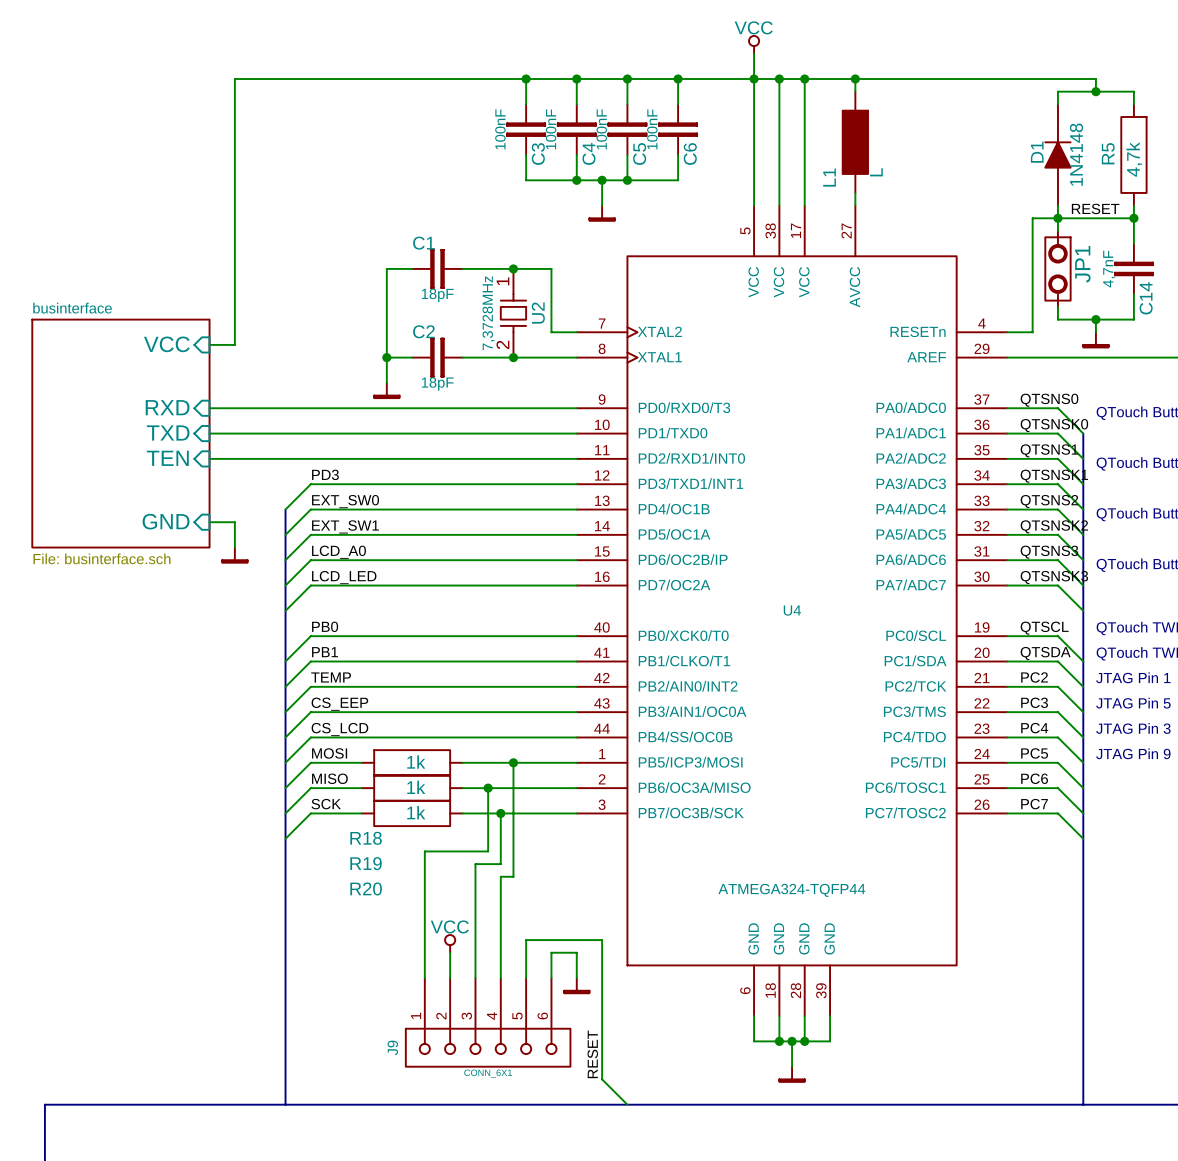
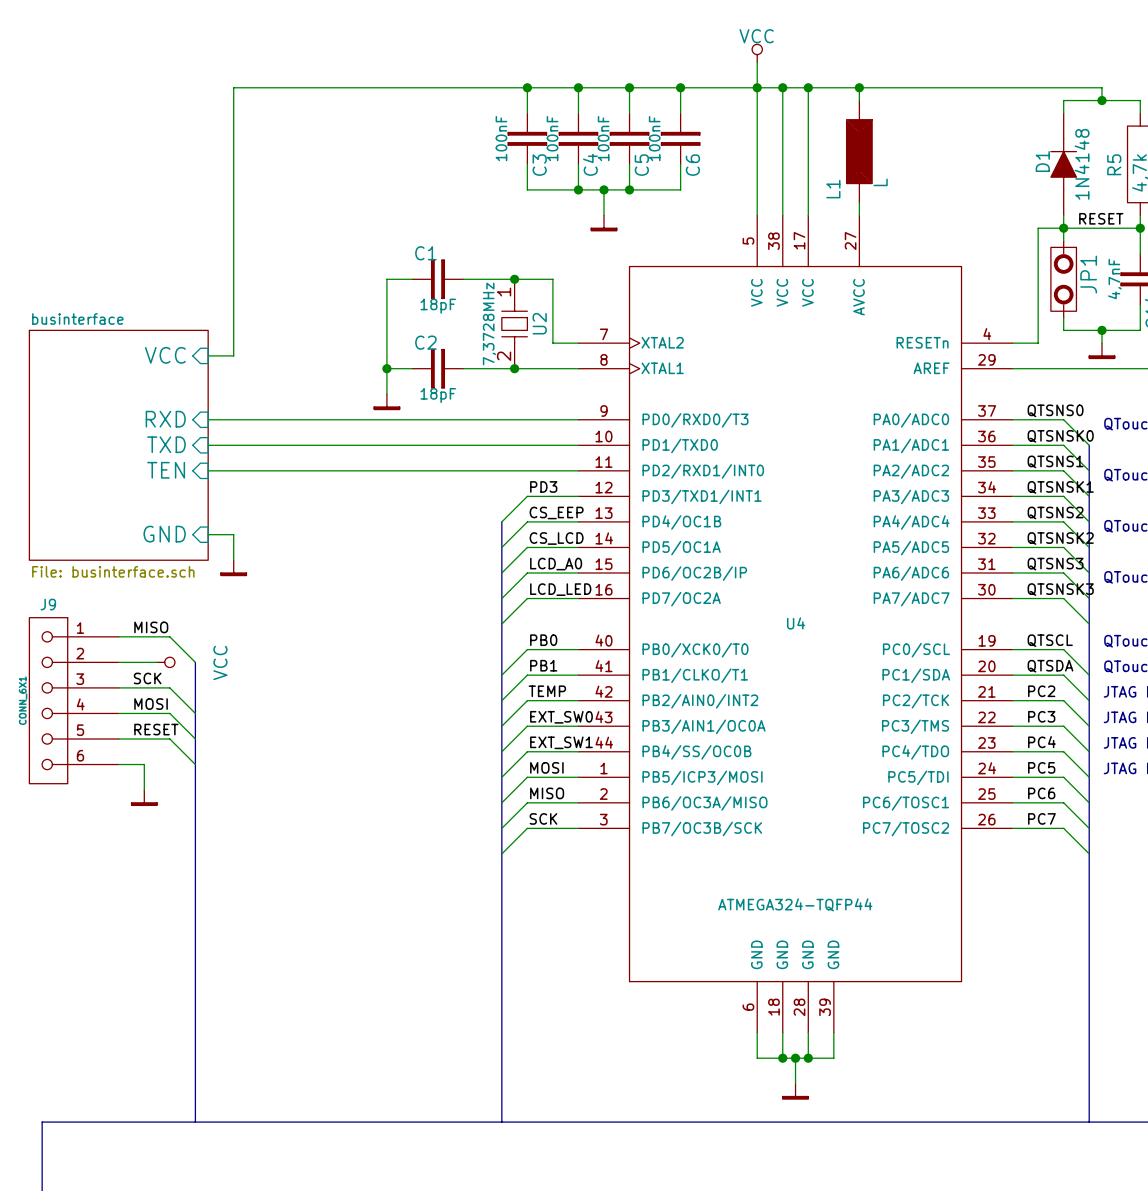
label position: PD3 (325, 474) -> PD3 (543, 486)
wire: (526, 484) (310, 484) (285, 509) -> (527, 496) (501, 521)
label: EXT_SW0 (345, 501) -> none
label: none -> CS_EEP (556, 512)
bus: (285, 509) (285, 1104) -> (501, 521) (501, 1122)
wire: (526, 509) (310, 509) (285, 534) -> (527, 521) (501, 547)
label: EXT_SW1 (345, 526) -> none
label: none -> CS_LCD (556, 538)
wire: (526, 534) (310, 534) (285, 560) -> (527, 547) (501, 572)
label position: LCD_A0 (339, 552) -> LCD_A0 (556, 564)
wire: (526, 560) (310, 560) (285, 585) -> (527, 572) (501, 598)
label position: LCD_LED (344, 577) -> LCD_LED (560, 589)
wire: (526, 585) (310, 585) (285, 610) -> (527, 598) (501, 624)
label: none -> MISO (151, 627)
wire: none -> (118, 636) (169, 636) (195, 662)
label position: PB0 (325, 626) -> PB0 (543, 640)
wire: (526, 636) (310, 636) (285, 661) -> (527, 649) (501, 675)
wire: none -> (118, 662) (157, 662)
power symbol: none -> VCC (166, 662)
bus: none -> (195, 662) (195, 1122)
label position: PB1 (325, 652) -> PB1 (543, 665)
wire: (526, 661) (310, 661) (285, 686) -> (527, 675) (501, 700)
label: none -> SCK (147, 678)
wire: none -> (118, 687) (169, 687) (195, 713)
label position: TEMP (331, 677) -> TEMP (547, 691)
wire: (526, 686) (310, 686) (285, 712) -> (527, 700) (501, 726)
label: none -> MOSI (151, 704)
wire: none -> (118, 713) (169, 713) (195, 738)
label: CS_EEP (339, 704) -> none
label: none -> EXT_SW0 (561, 717)
wire: (526, 712) (310, 712) (285, 737) -> (527, 726) (501, 751)
label: none -> RESET (156, 729)
wire: none -> (118, 738) (169, 738) (195, 764)
label: CS_LCD (339, 729) -> none
label: none -> EXT_SW1 (561, 742)
wire: (526, 737) (310, 737) (285, 762) -> (527, 751) (501, 777)
wire: none -> (118, 764) (144, 764) (144, 790)
label: MOSI (329, 753) -> none
label: none -> MOSI (546, 767)
wire: (361, 762) (310, 762) (285, 788) -> none
R18: 1k (412, 762) -> none
wire: (462, 762) (526, 762) -> (501, 802) (527, 777)
wire: (513, 762) (513, 876) (500, 876) (500, 978) -> none
junction: (513, 762) -> none
label: MISO (329, 778) -> none
label: none -> MISO (547, 793)
power symbol: none -> (144, 797)
wire: (361, 788) (310, 788) (285, 813) -> none
R19: 1k (412, 788) -> none
wire: (462, 788) (526, 788) -> (501, 828) (527, 802)
wire: (488, 788) (488, 851) (424, 851) (424, 978) -> none
junction: (488, 788) -> none
label: SCK (326, 804) -> none
label: none -> SCK (543, 818)
wire: (361, 813) (310, 813) (285, 838) -> none
R20: 1k (412, 813) -> none
wire: (462, 813) (526, 813) -> (501, 853) (527, 828)
wire: (500, 813) (500, 864) (475, 864) (475, 978) -> none
junction: (500, 813) -> none
power symbol: VCC (450, 943) -> none
wire: (450, 952) (450, 978) -> none
wire: (526, 978) (526, 940) (602, 940) (602, 1079) (627, 1104) -> none
wire: (551, 978) (551, 952) (576, 952) (576, 978) -> none
power symbol: (576, 985) -> none
J9 position: (488, 1022) -> (74, 700)
J9 rotation: 0° (488, 1047) -> 90° clockwise (48, 700)
label: RESET (592, 1054) -> none

